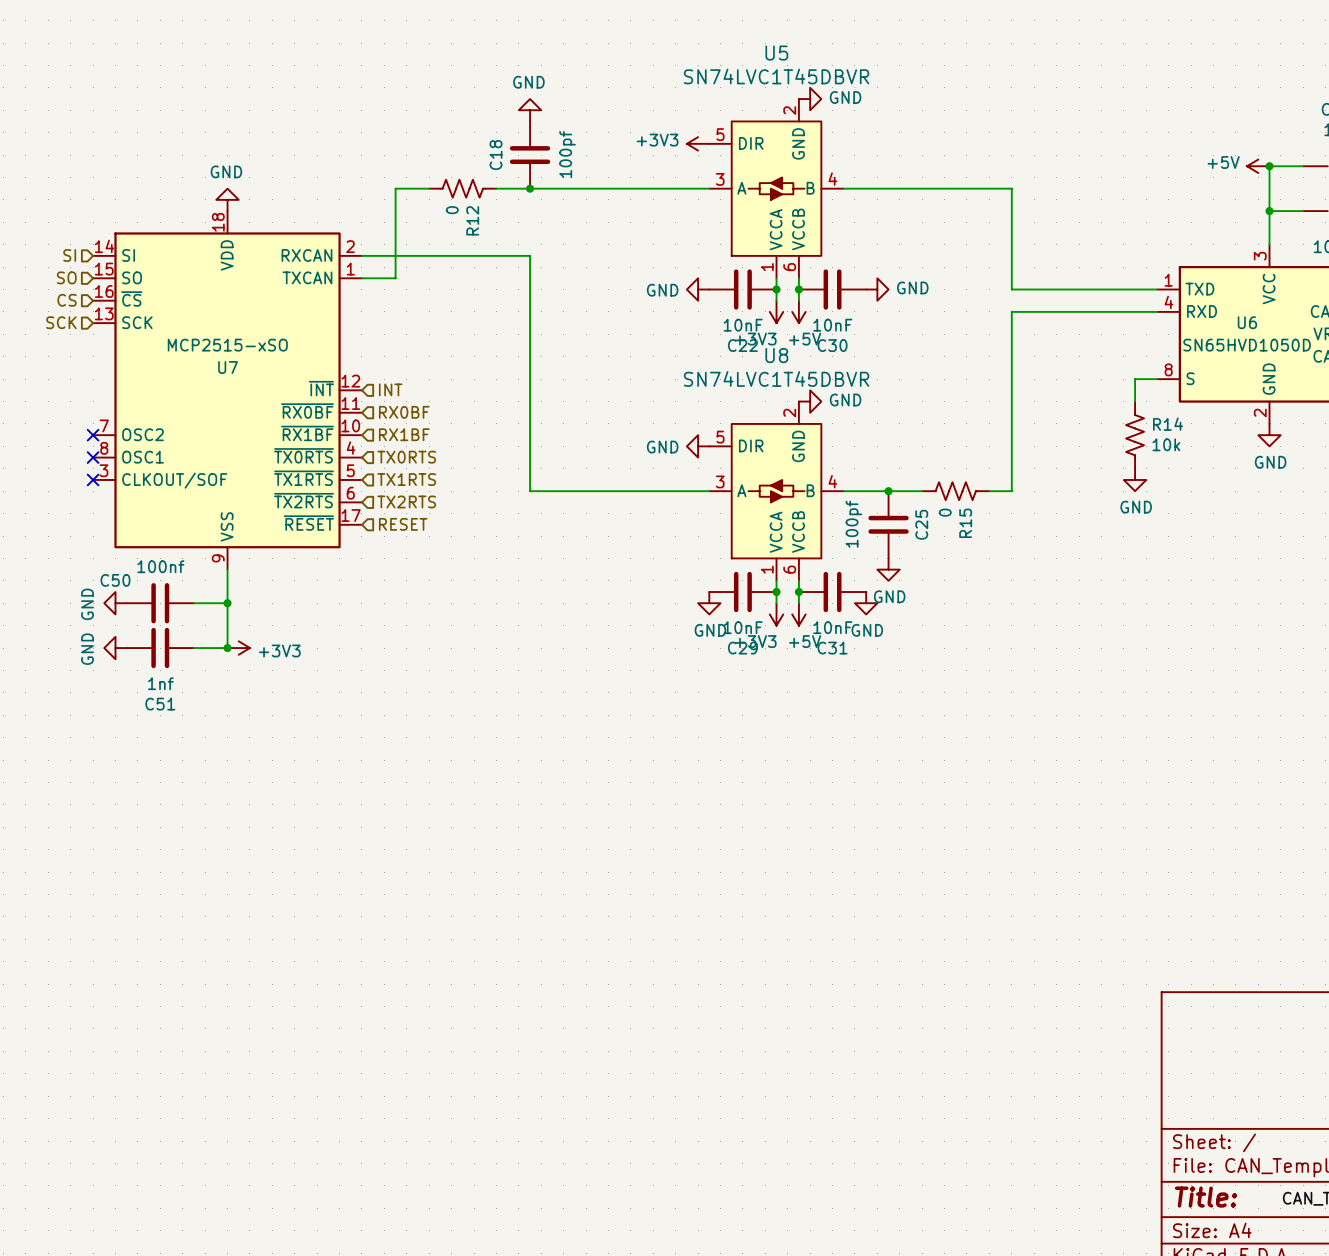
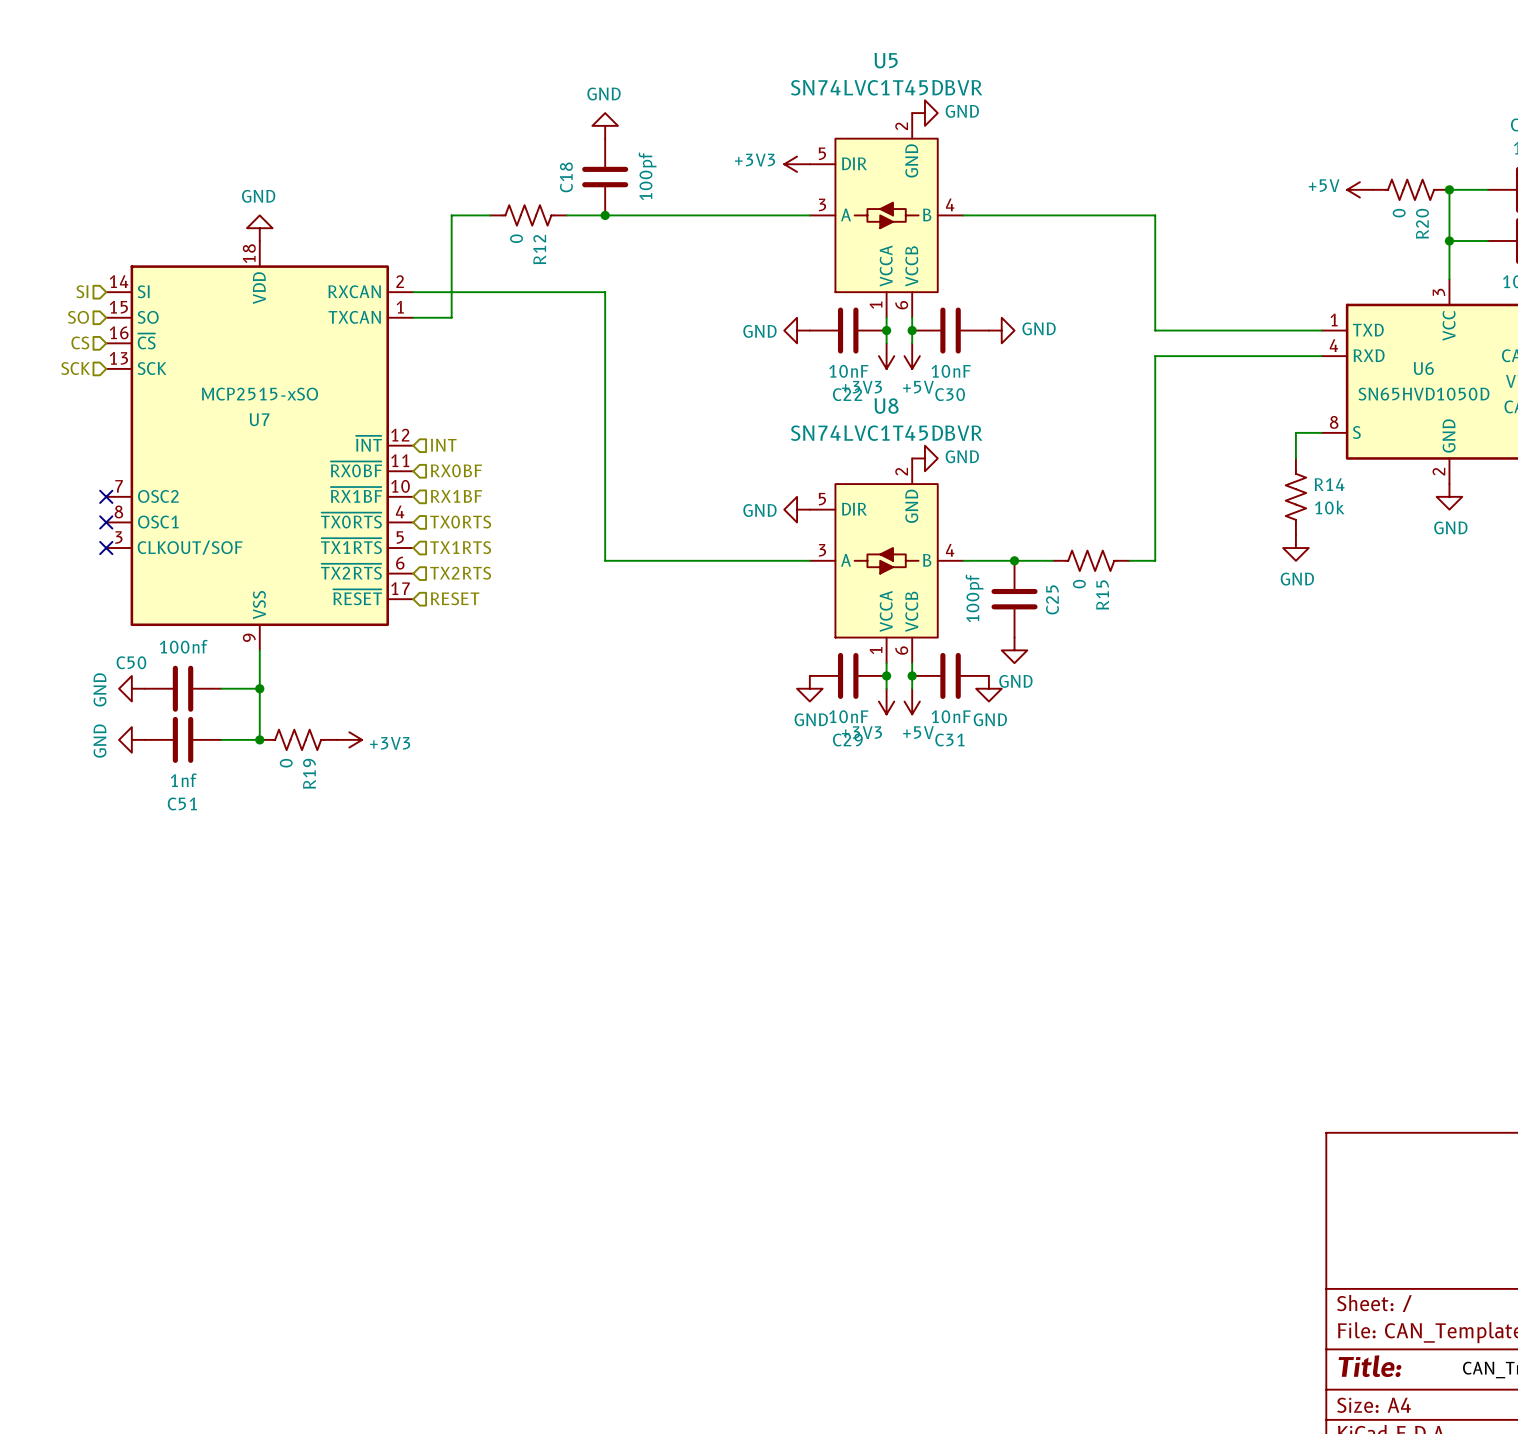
R20: none -> 0 (1411, 189)
power symbol position: +5V (1258, 166) -> +5V (1359, 189)
power symbol position: +3V3 (238, 648) -> +3V3 (349, 739)
R19: none -> 0 (298, 739)

